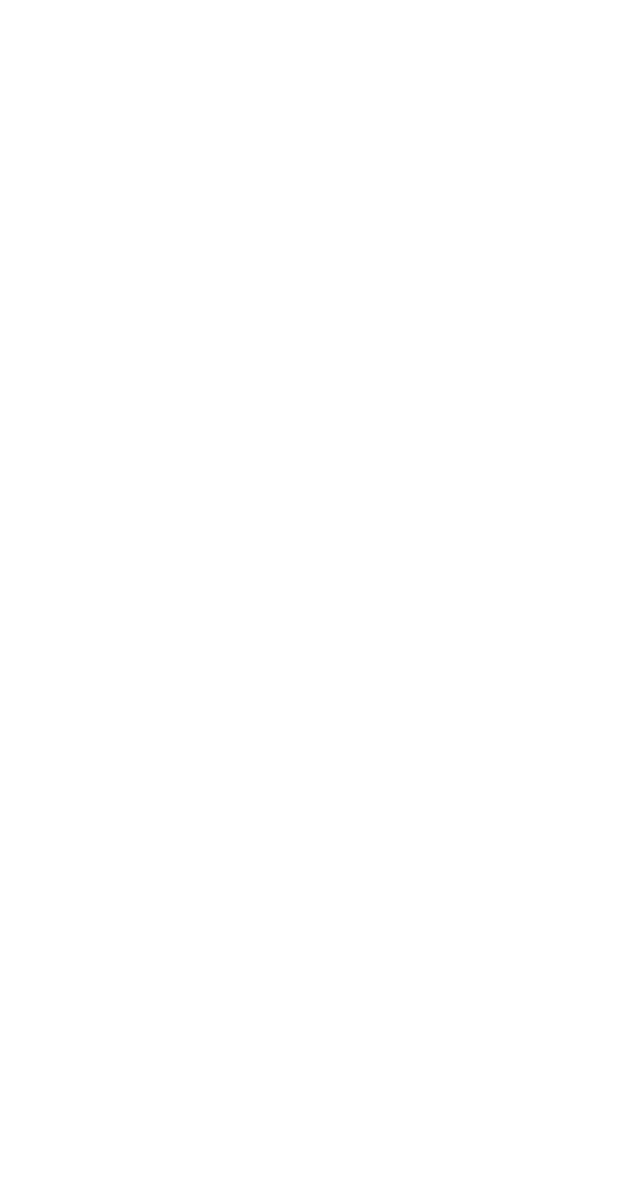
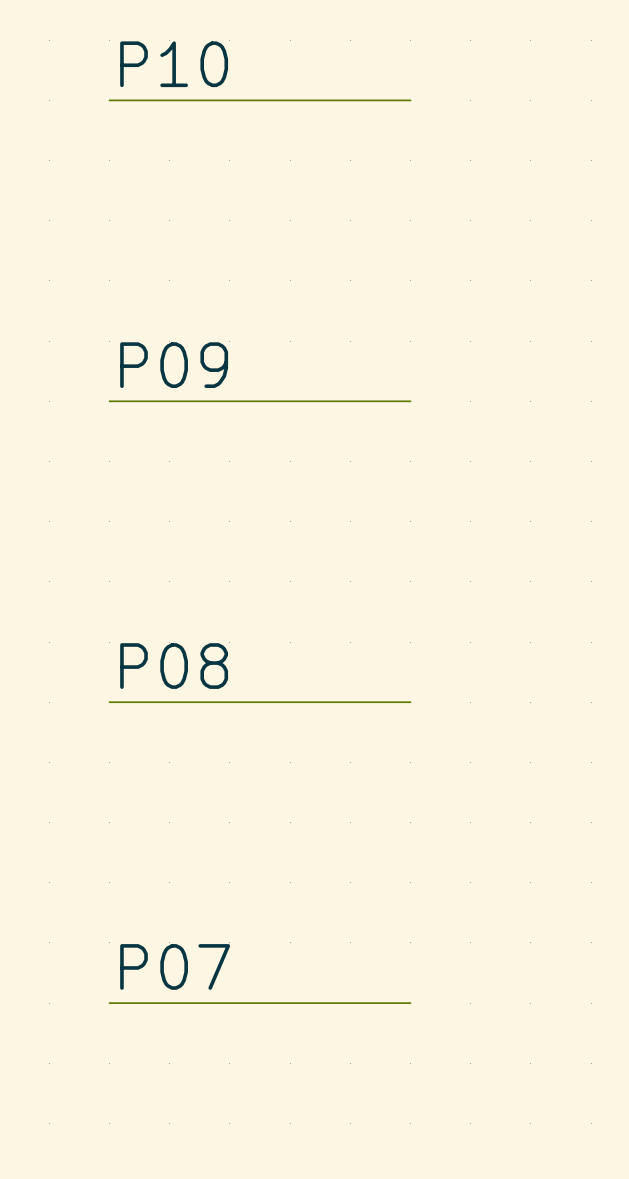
label: none -> P10 (174, 64)
wire: none -> (109, 100) (410, 100)
label: none -> P09 (174, 365)
wire: none -> (109, 401) (410, 401)
label: none -> P08 (174, 666)
wire: none -> (109, 702) (410, 702)
label: none -> P07 (175, 966)
wire: none -> (109, 1003) (410, 1003)

